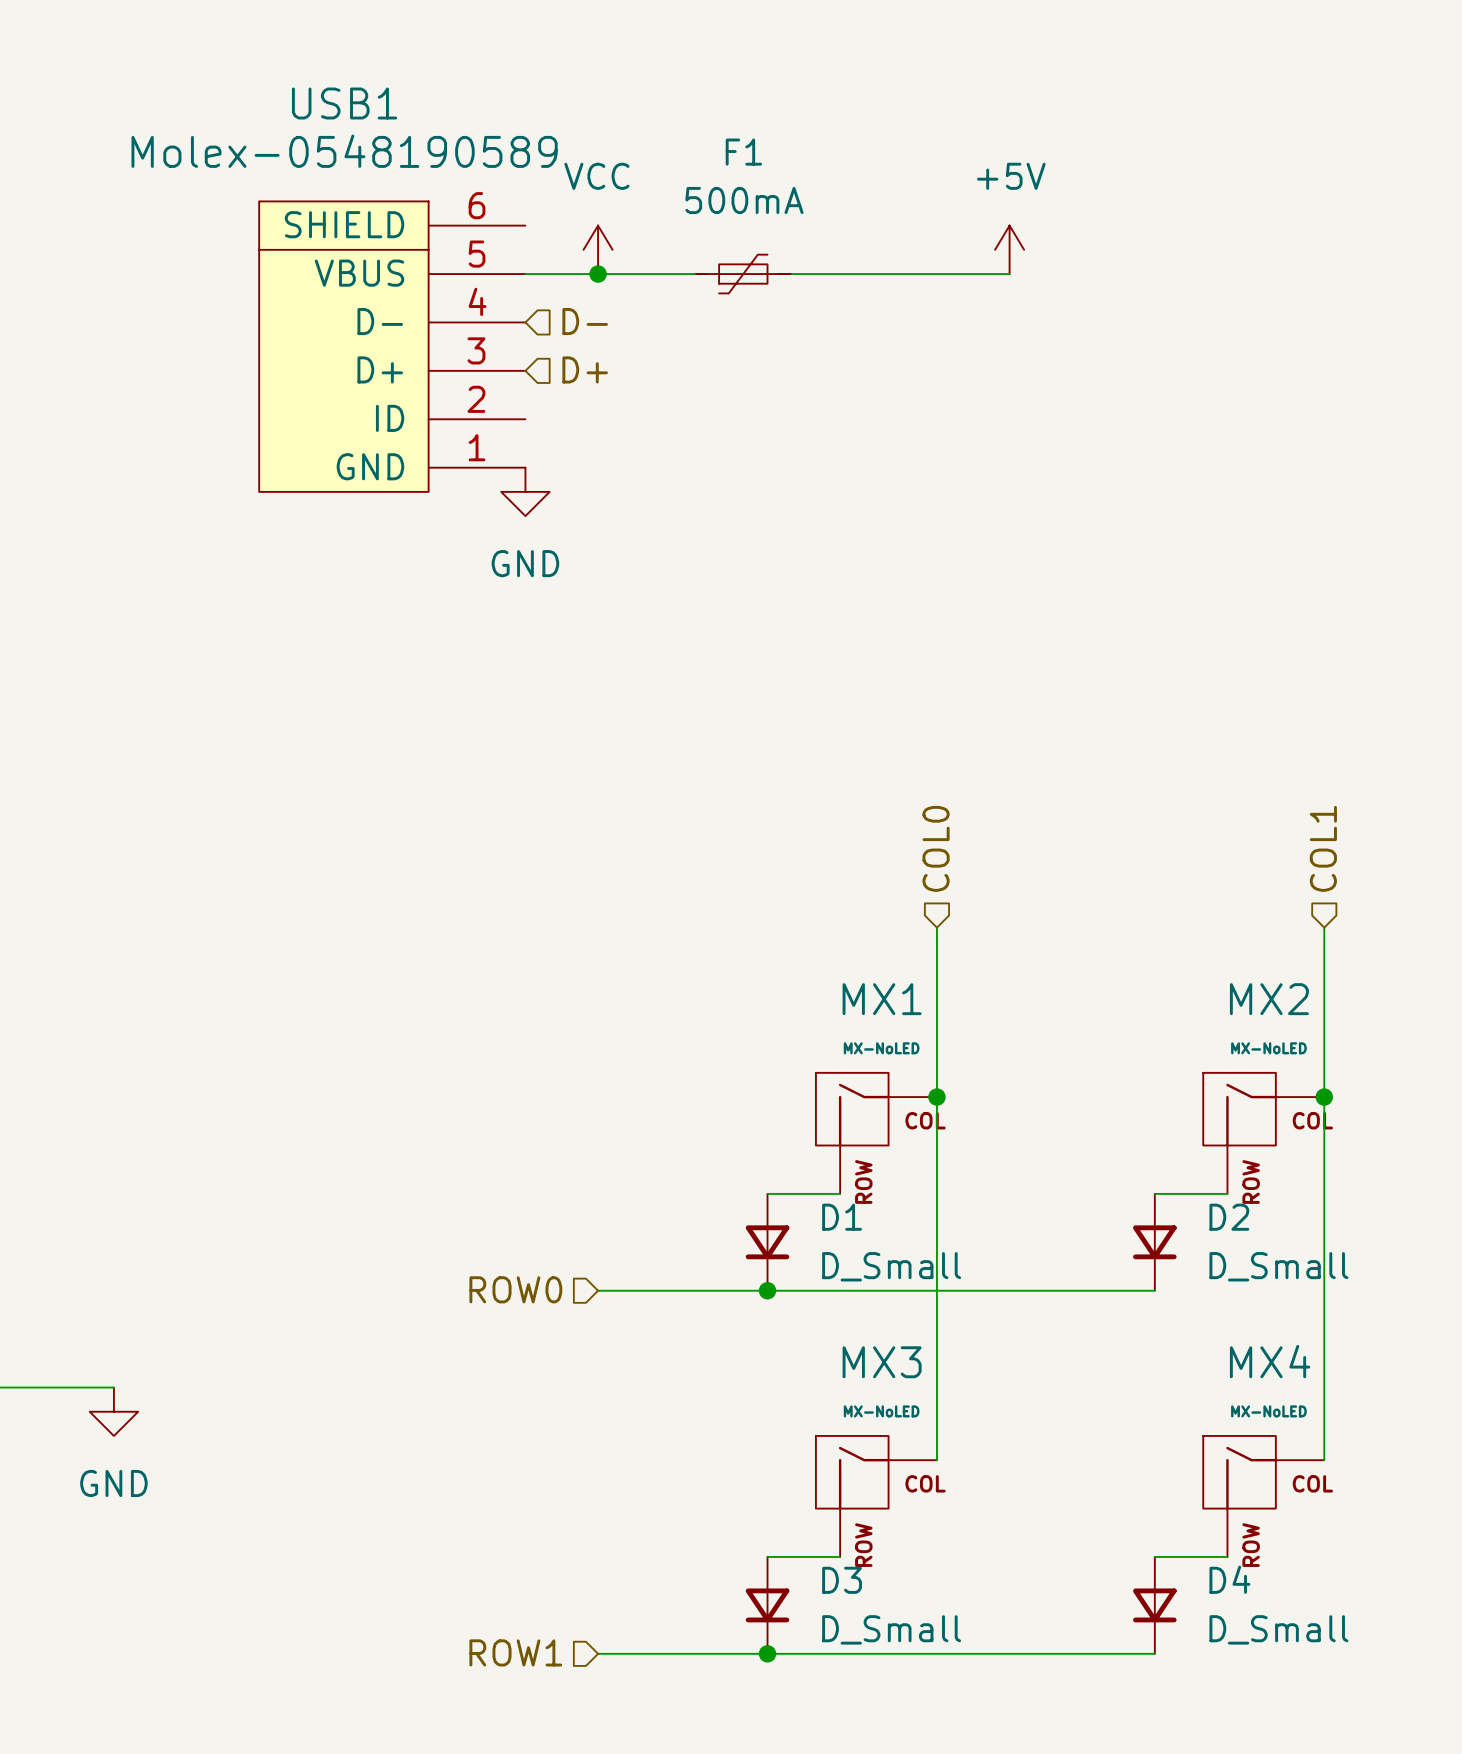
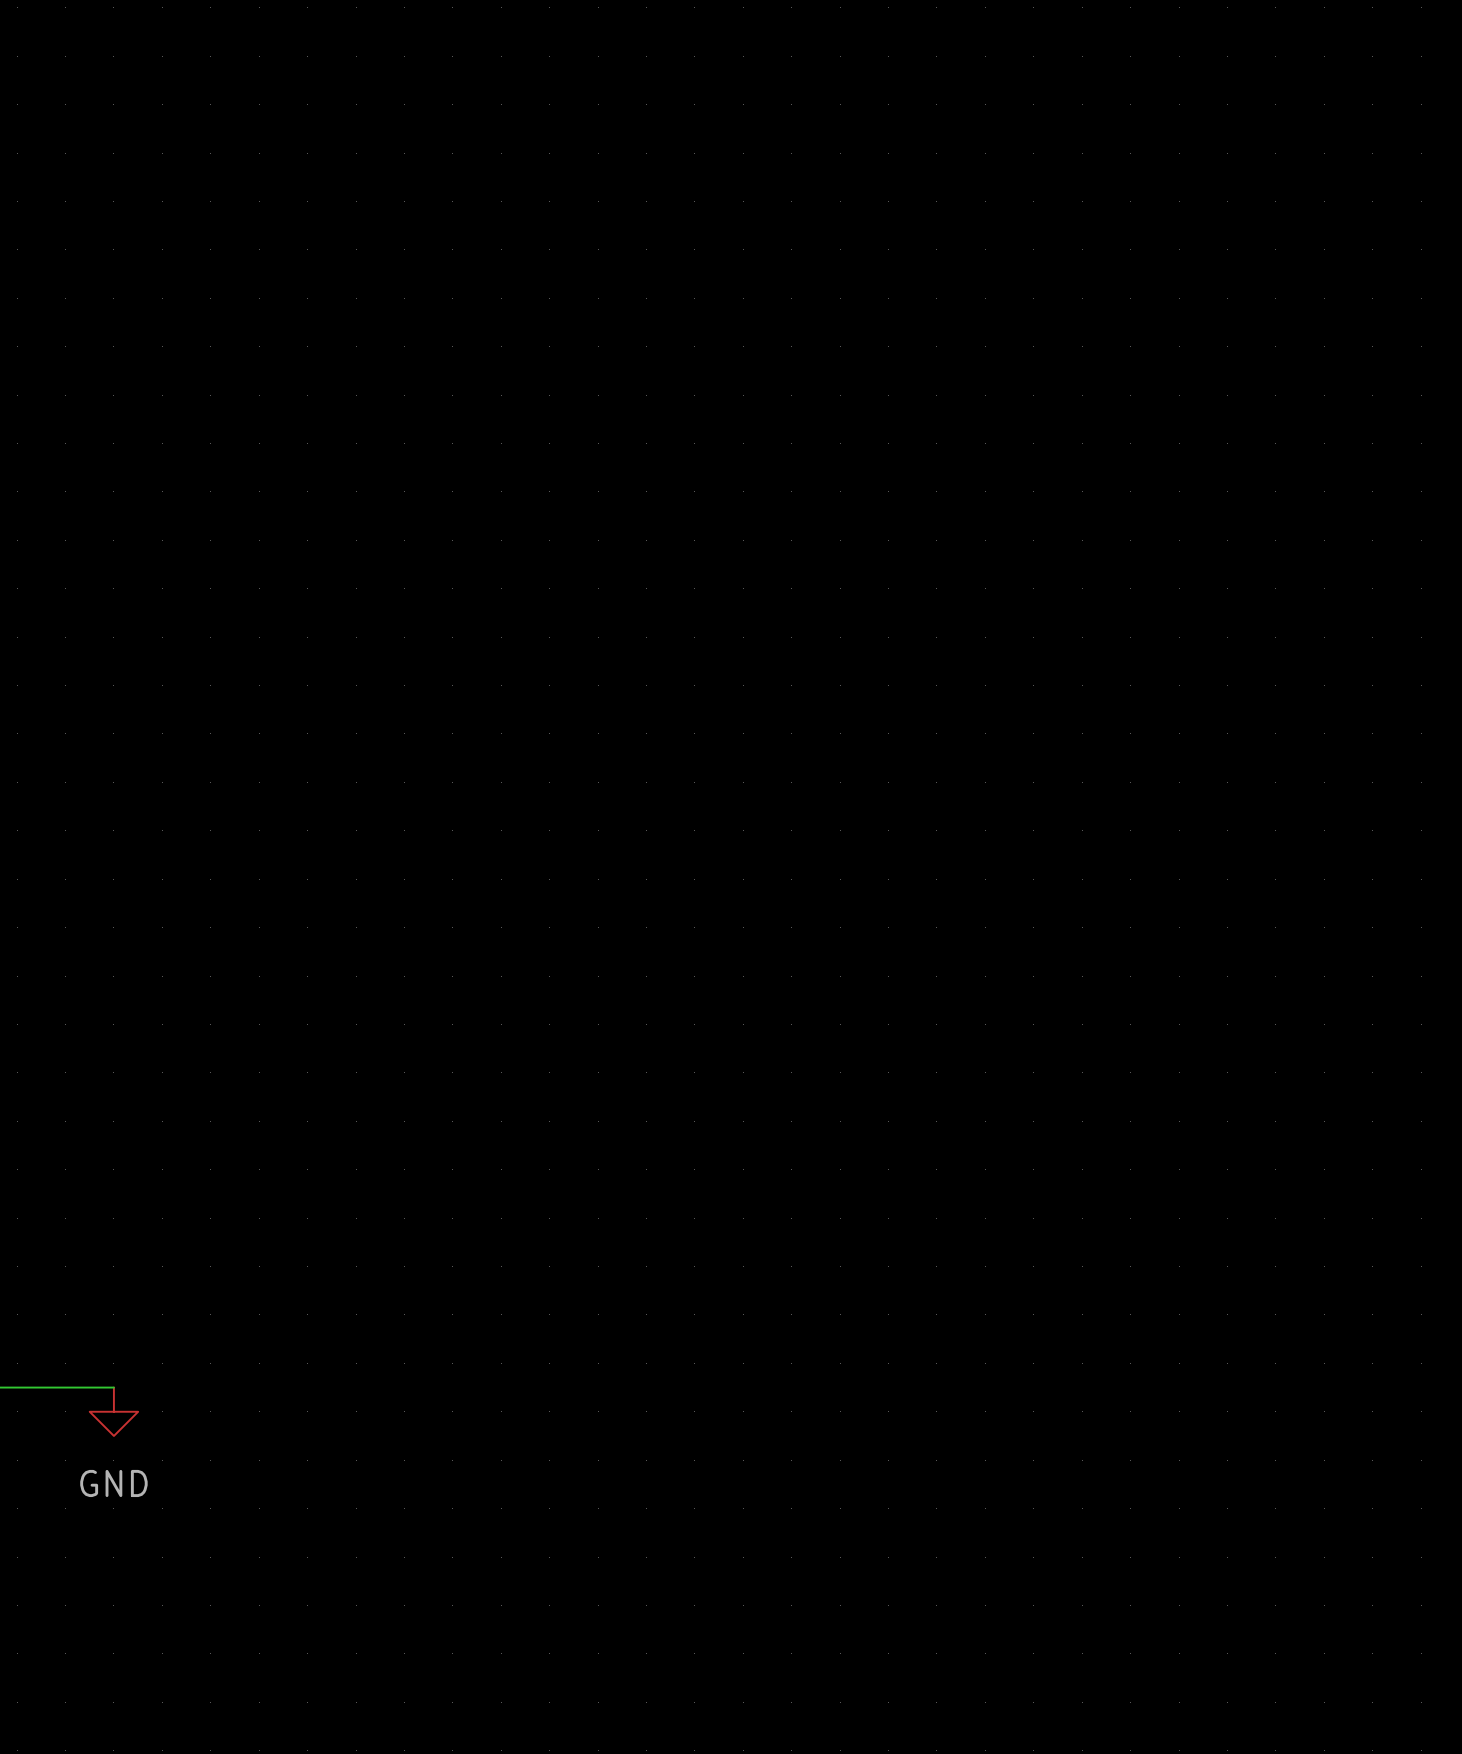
power symbol: VCC (598, 249) -> none
power symbol: +5V (1009, 249) -> none
wire: (525, 274) (694, 274) -> none
junction: (598, 274) -> none
F1: 500mA (743, 274) -> none
wire: (791, 274) (1009, 274) -> none
hierarchical label: D- (585, 321) -> none
USB1: Molex-0548190589 (392, 346) -> none
hierarchical label: D+ (585, 369) -> none
power symbol: GND (525, 491) -> none
hierarchical label: COL0 (936, 848) -> none
hierarchical label: COL1 (1323, 848) -> none
wire: (936, 927) (936, 1460) -> none
wire: (1324, 927) (1324, 1460) -> none
junction: (936, 1097) -> none
junction: (1324, 1097) -> none
MX1: MX-NoLED (876, 1133) -> none
MX2: MX-NoLED (1263, 1133) -> none
wire: (767, 1193) (840, 1193) -> none
wire: (1154, 1193) (1227, 1193) -> none
D1: D_Small (767, 1242) -> none
D2: D_Small (1154, 1242) -> none
hierarchical label: ROW0 (515, 1289) -> none
wire: (598, 1290) (1154, 1290) -> none
junction: (767, 1290) -> none
MX3: MX-NoLED (876, 1496) -> none
MX4: MX-NoLED (1263, 1496) -> none
wire: (767, 1557) (840, 1557) -> none
wire: (1154, 1557) (1227, 1557) -> none
D3: D_Small (767, 1605) -> none
D4: D_Small (1154, 1605) -> none
hierarchical label: ROW1 (515, 1652) -> none
wire: (598, 1653) (1154, 1653) -> none
junction: (767, 1653) -> none

